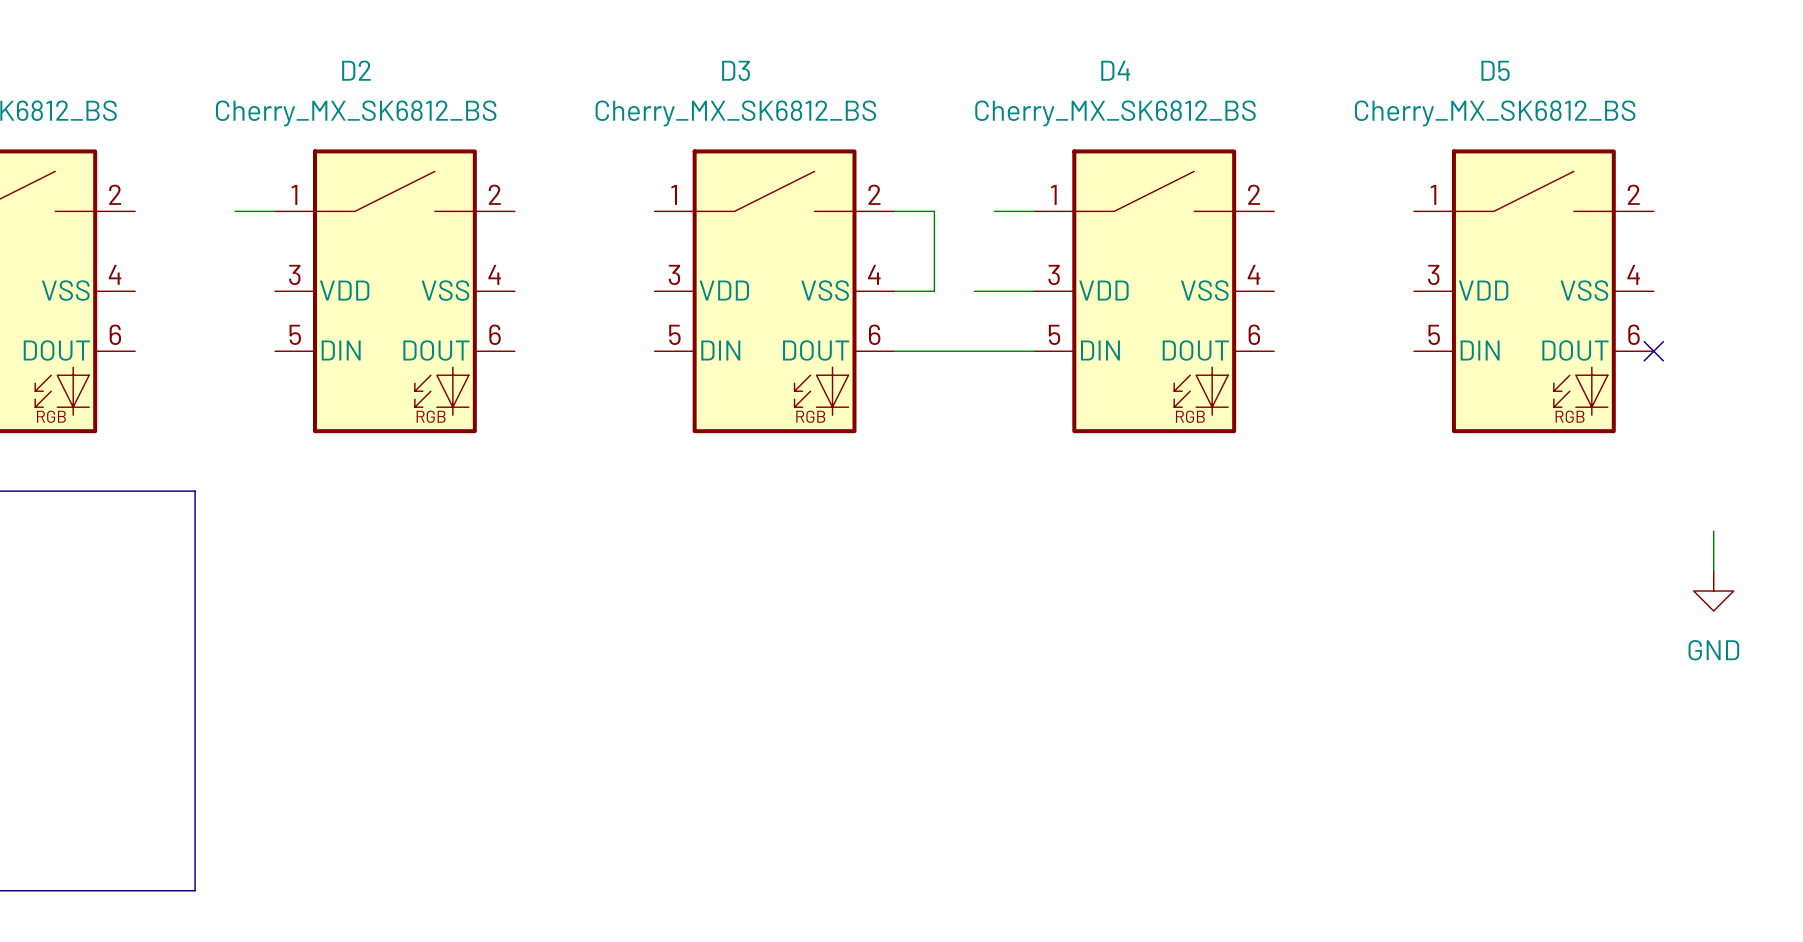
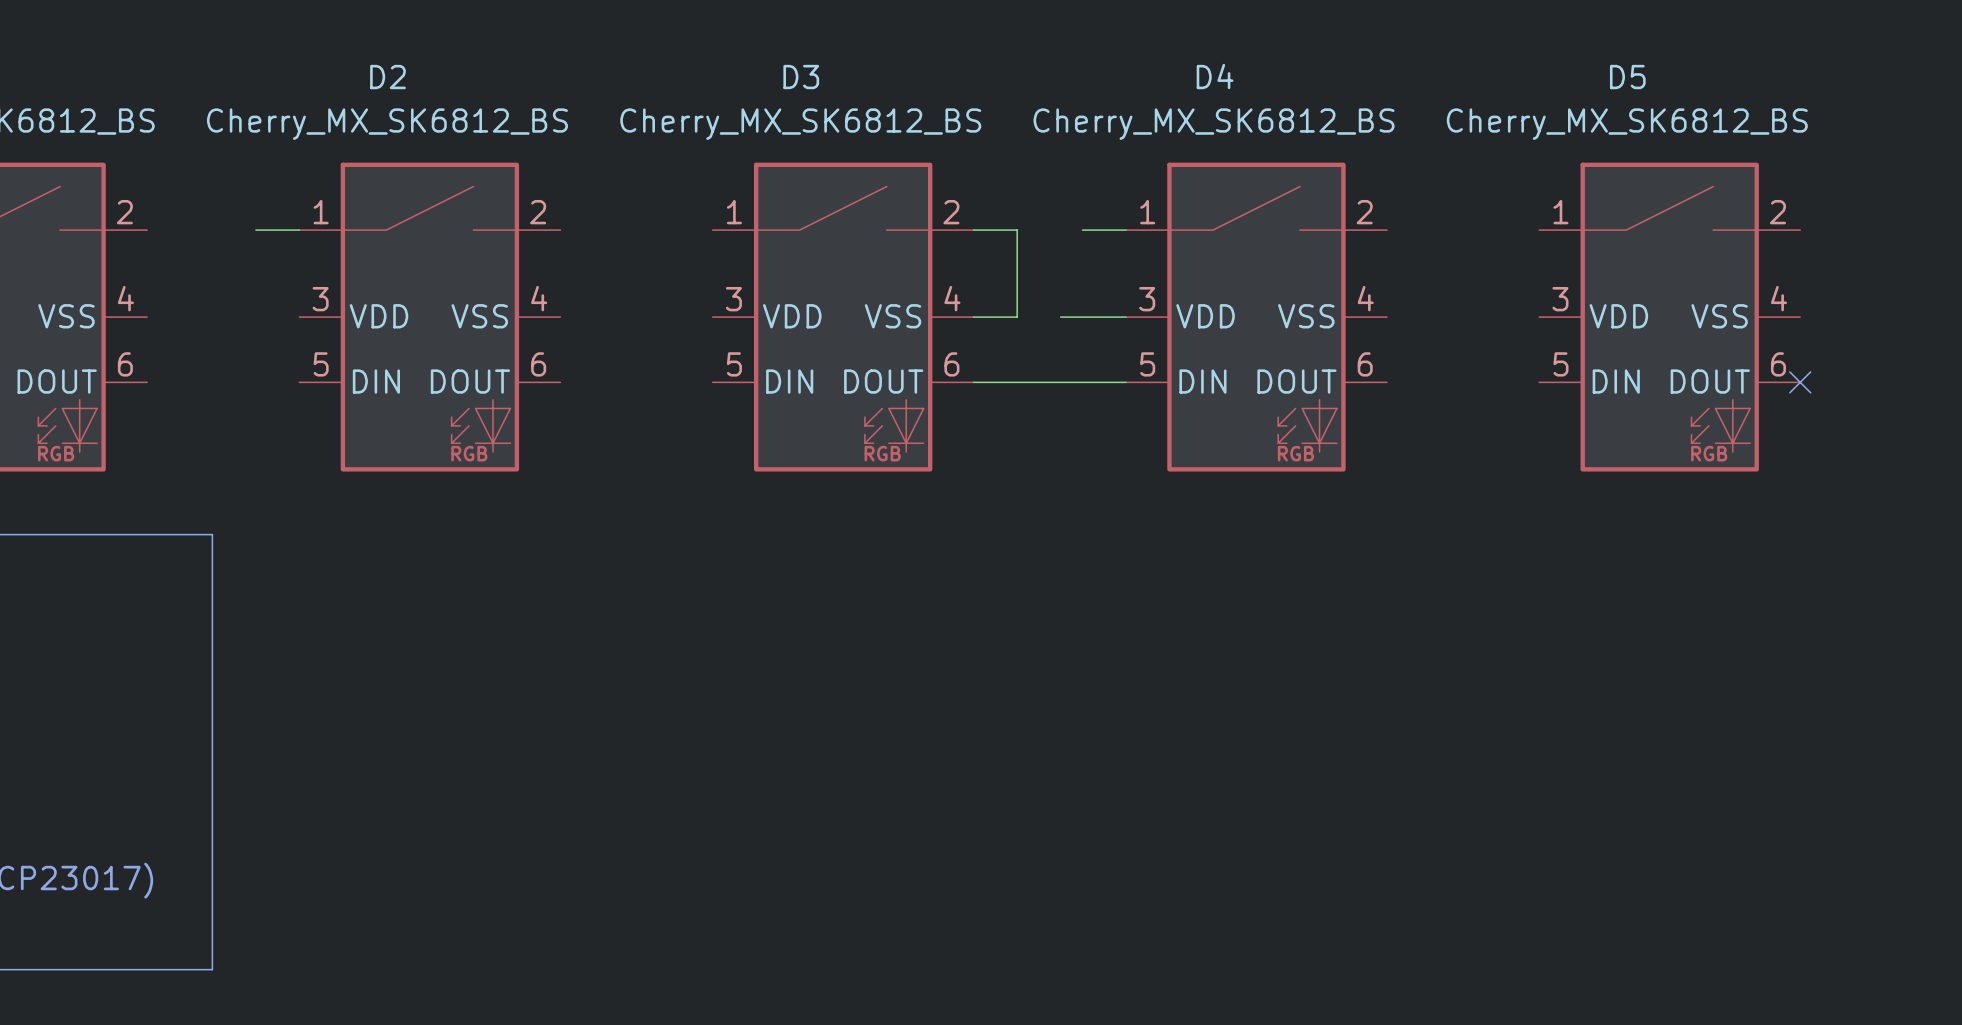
wire: (1713, 531) (1713, 571) -> none
power symbol: GND (1713, 591) -> none

